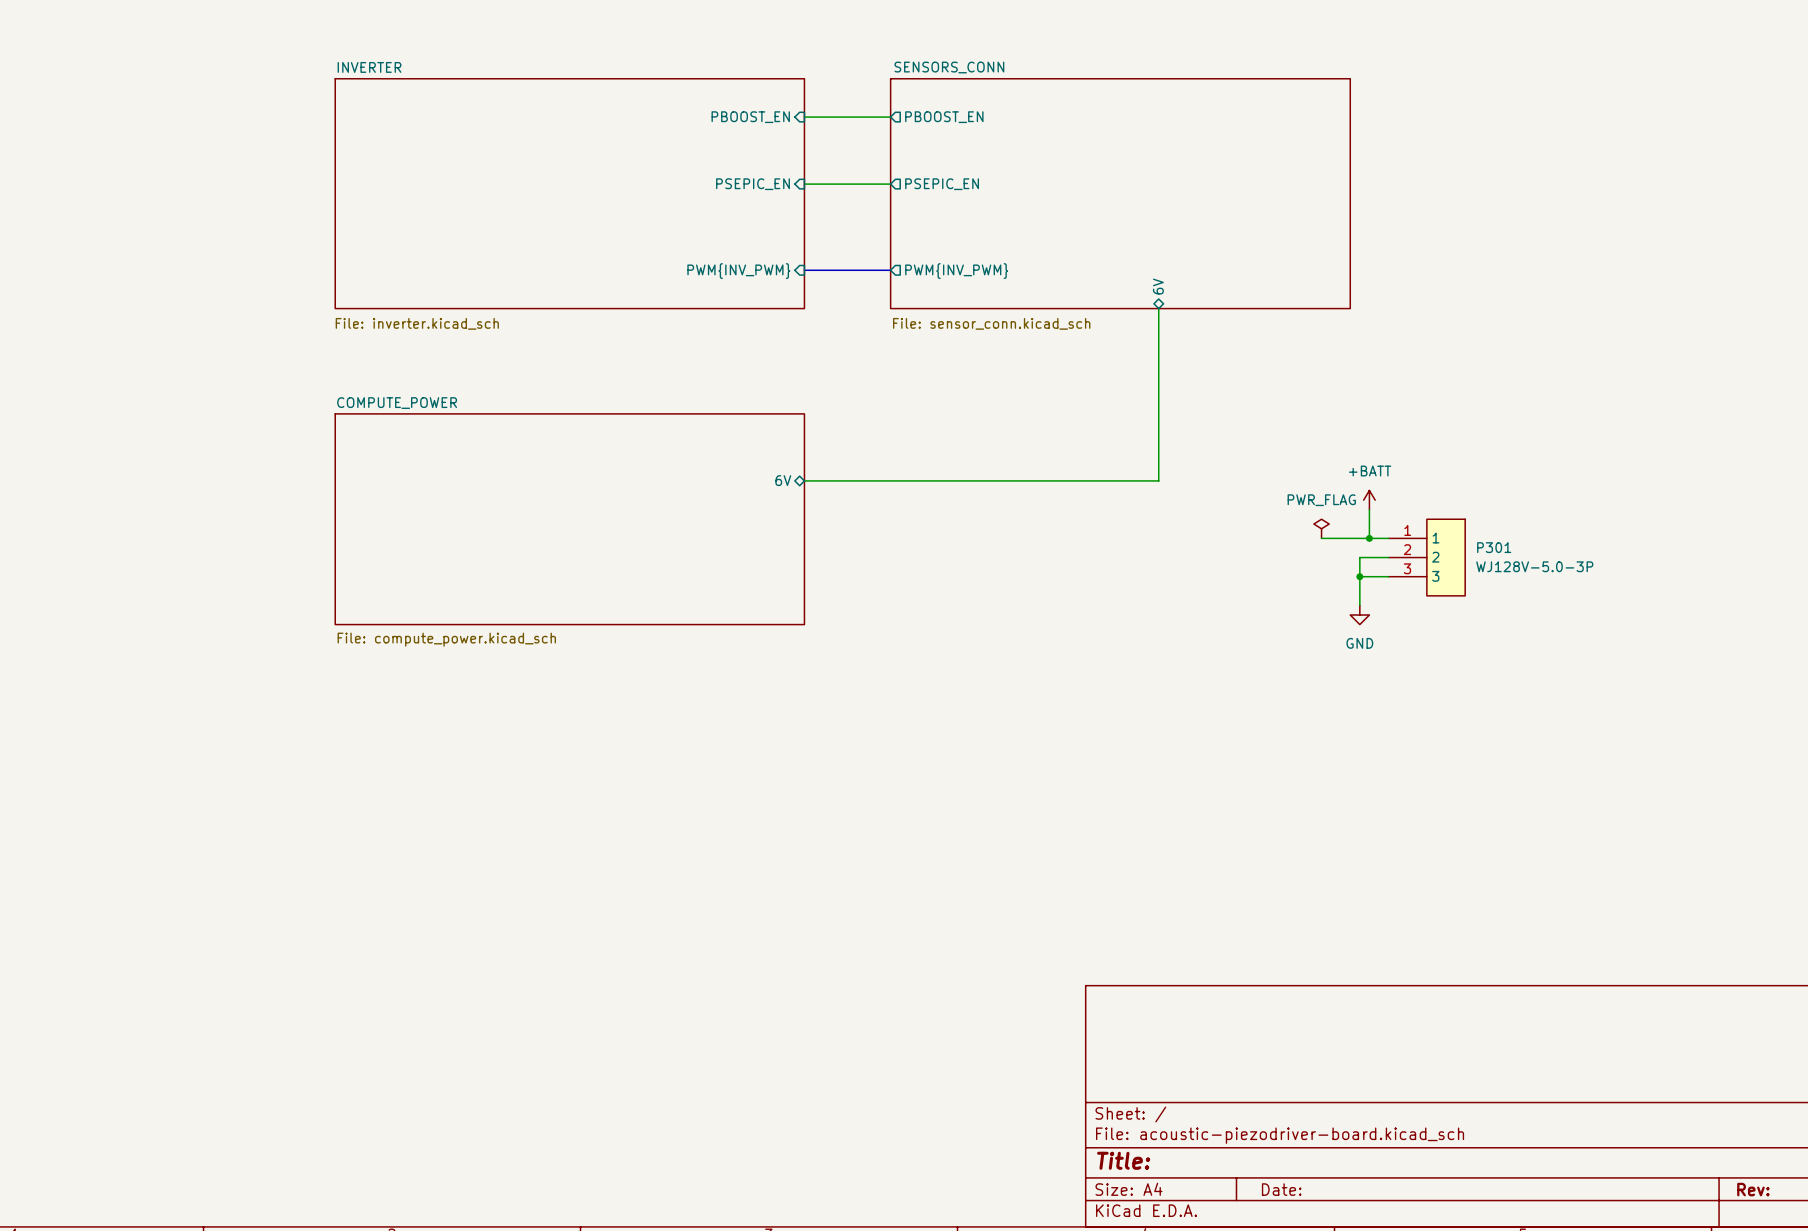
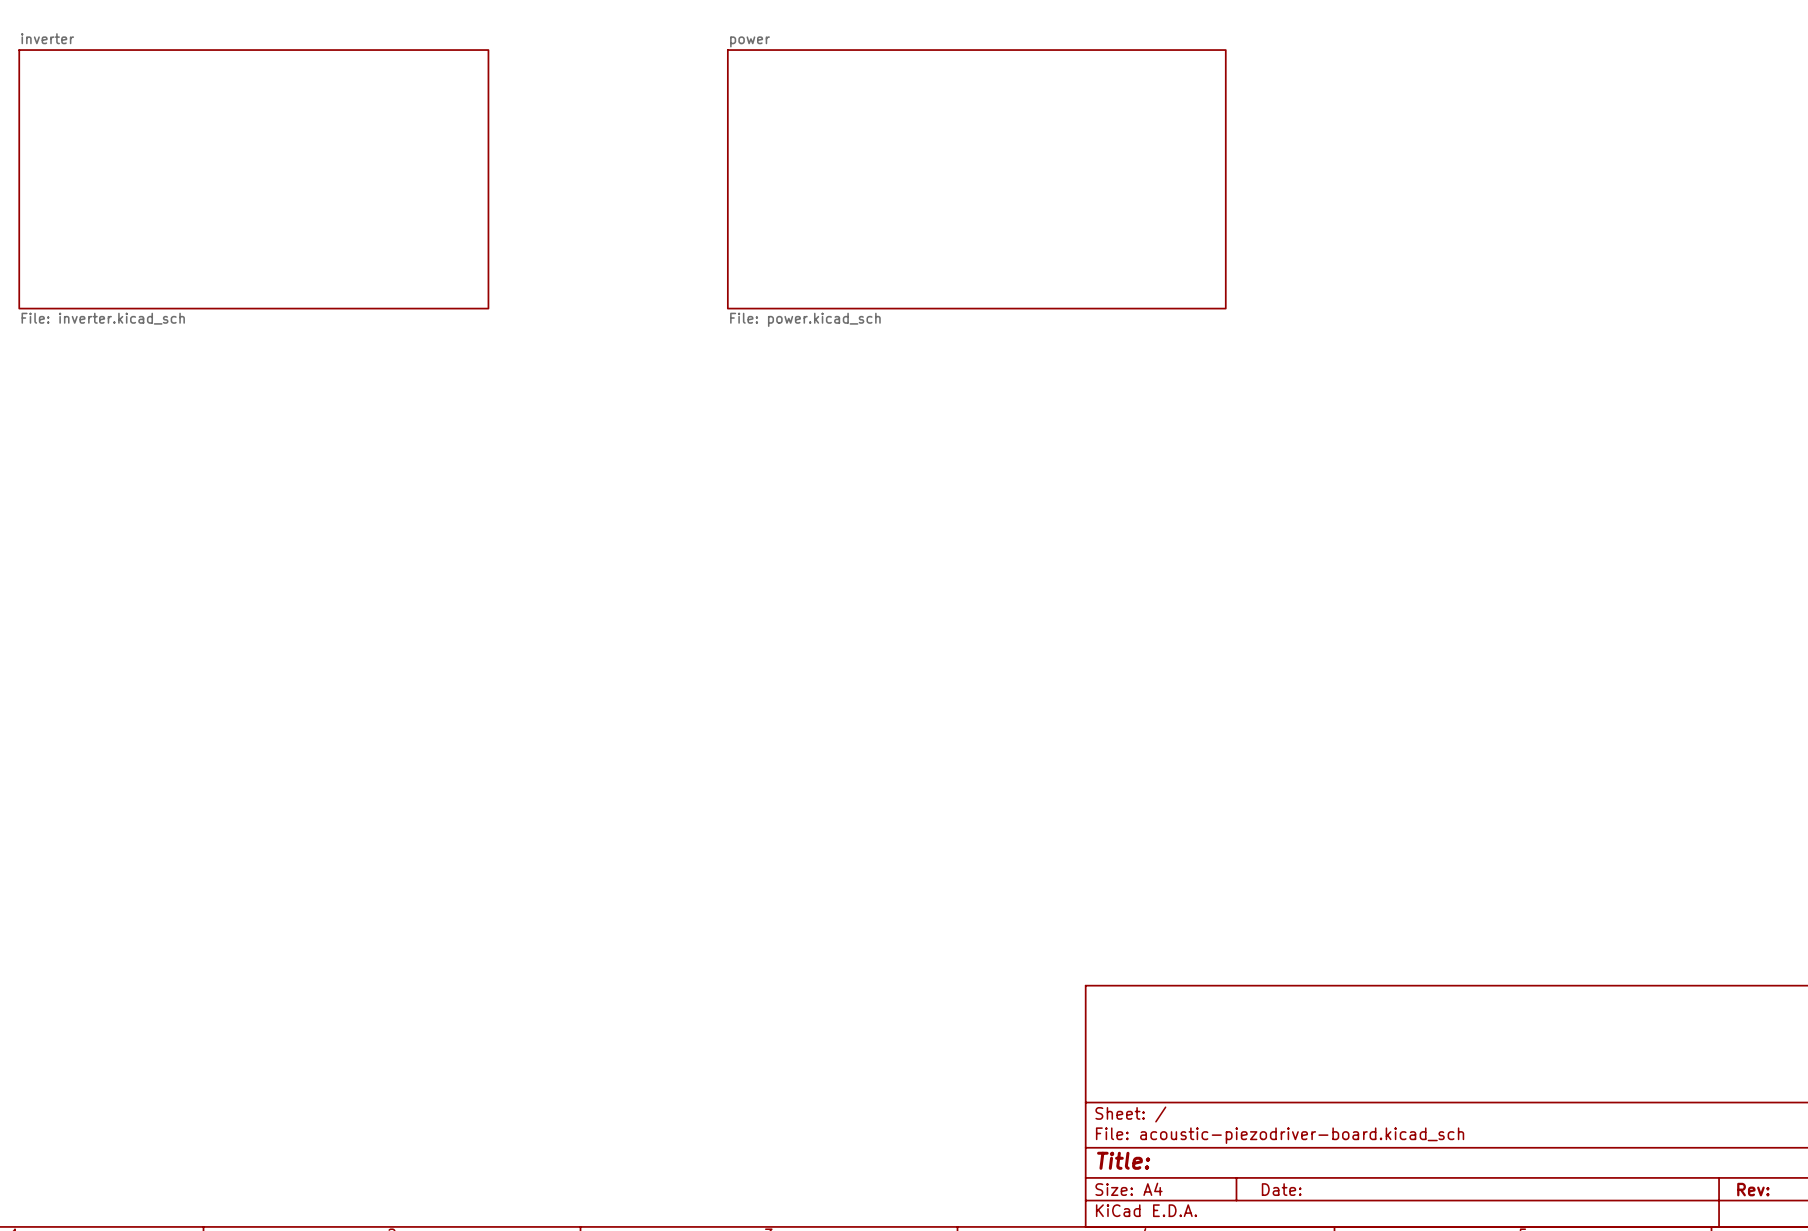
sheet pin: PBOOST_EN (750, 117) -> none
wire: (804, 117) (890, 117) -> none
sheet pin: PBOOST_EN (944, 117) -> none
sheet inverter: none -> File: inverter.kicad_sch (253, 179)
sheet power: none -> File: power.kicad_sch (976, 179)
sheet pin: PSEPIC_EN (753, 184) -> none
wire: (804, 184) (890, 184) -> none
sheet pin: PSEPIC_EN (942, 184) -> none
sheet INVERTER: File: inverter.kicad_sch (569, 193) -> none
sheet SENSORS_CONN: File: sensor_conn.kicad_sch (1120, 193) -> none
bus: (804, 270) (890, 270) -> none
sheet pin: PWM{INV_PWM} (738, 271) -> none
sheet pin: PWM{INV_PWM} (956, 271) -> none
sheet pin: 6V (1158, 286) -> none
wire: (1158, 308) (1158, 480) (804, 480) -> none
sheet pin: 6V (783, 480) -> none
power symbol: +BATT (1369, 500) -> none
wire: (1369, 509) (1369, 538) -> none
sheet COMPUTE_POWER: File: compute_power.kicad_sch (569, 519) -> none
power symbol: PWR_FLAG (1321, 528) -> none
wire: (1321, 538) (1388, 538) -> none
junction: (1369, 538) -> none
wire: (1388, 557) (1359, 557) (1359, 605) -> none
P301: WJ128V-5.0-3P (1426, 557) -> none
wire: (1359, 576) (1388, 576) -> none
junction: (1359, 576) -> none
power symbol: GND (1359, 615) -> none

